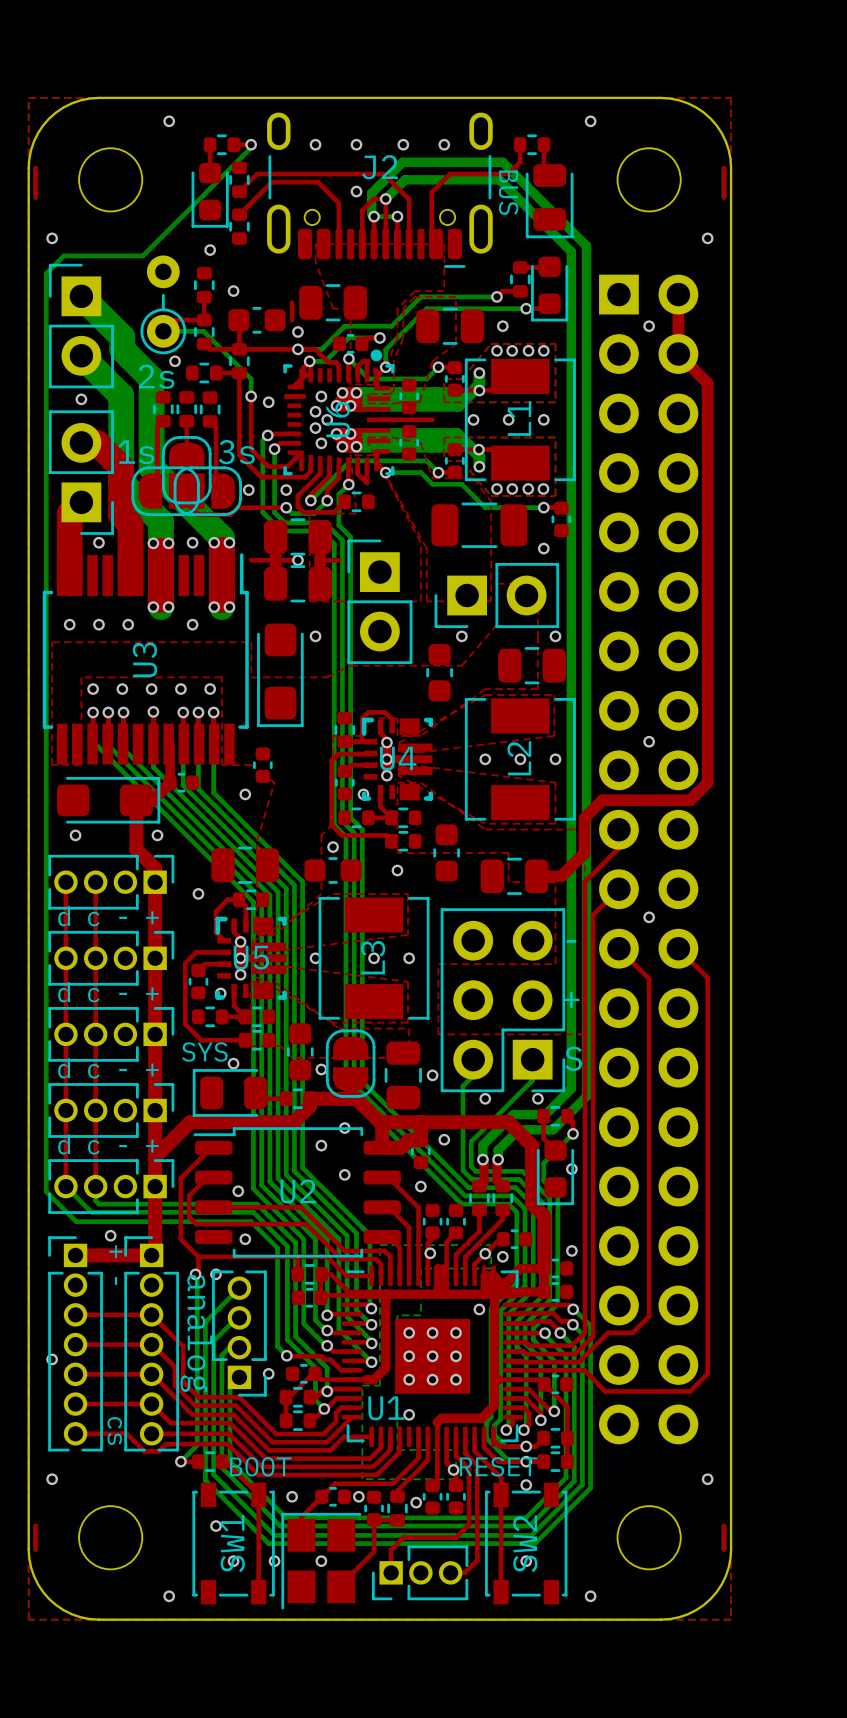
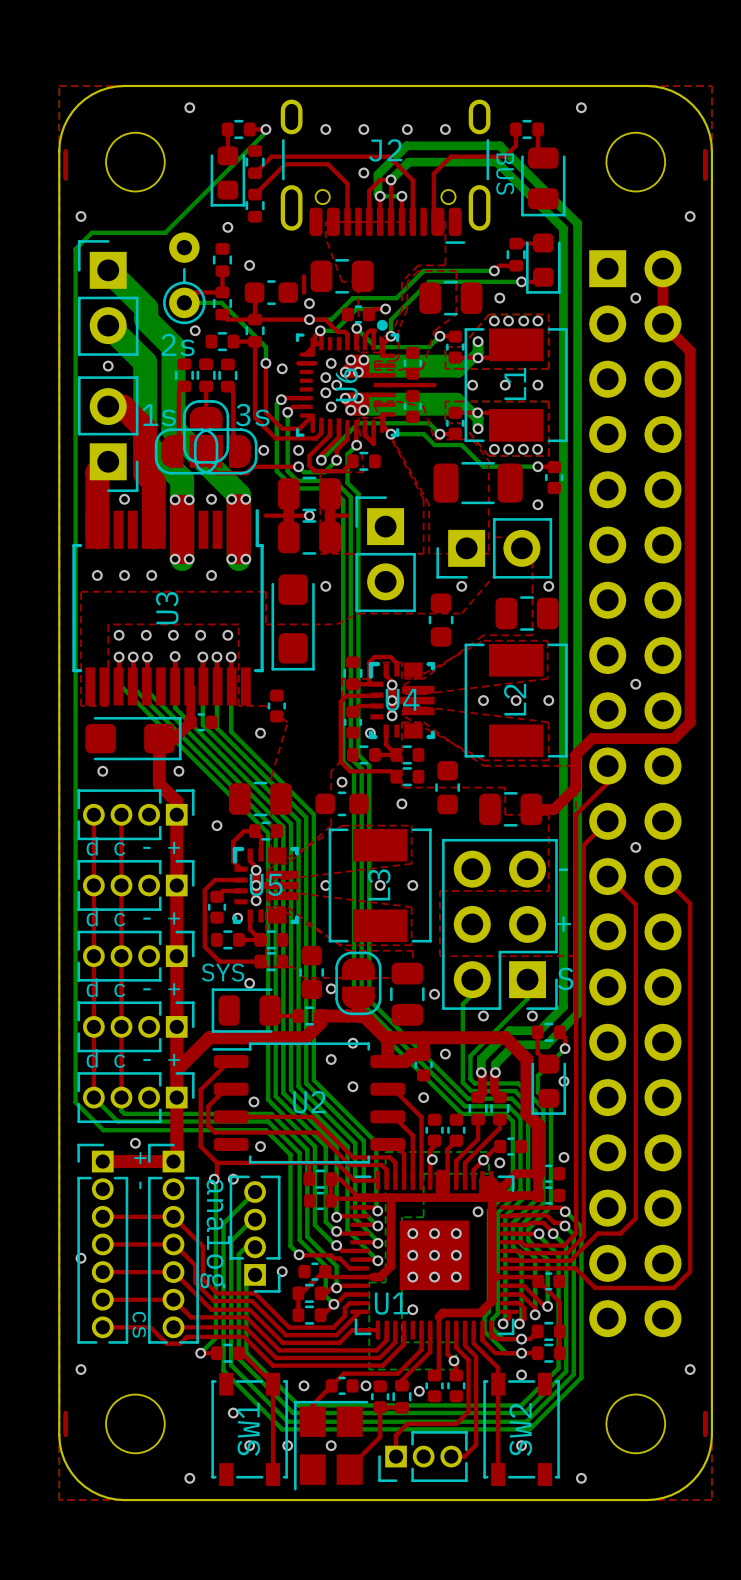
text: BOOT (260, 1466) -> none
text: RESET (498, 1466) -> none

